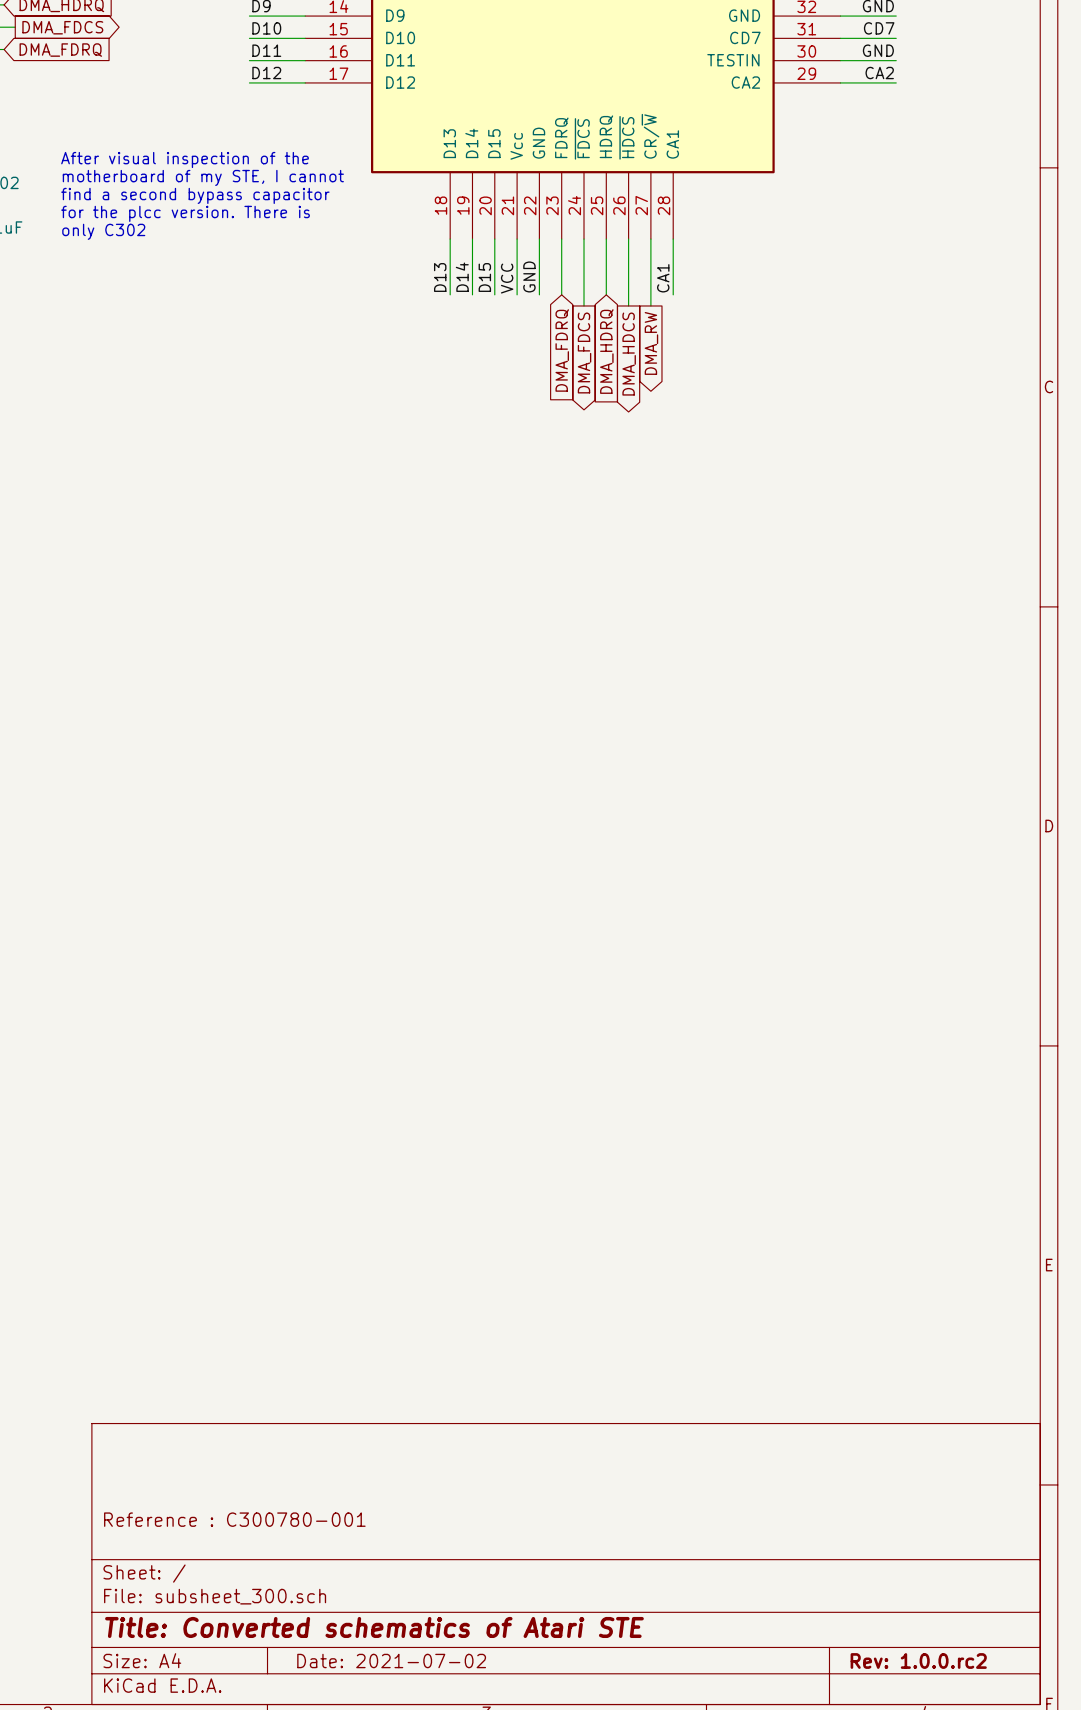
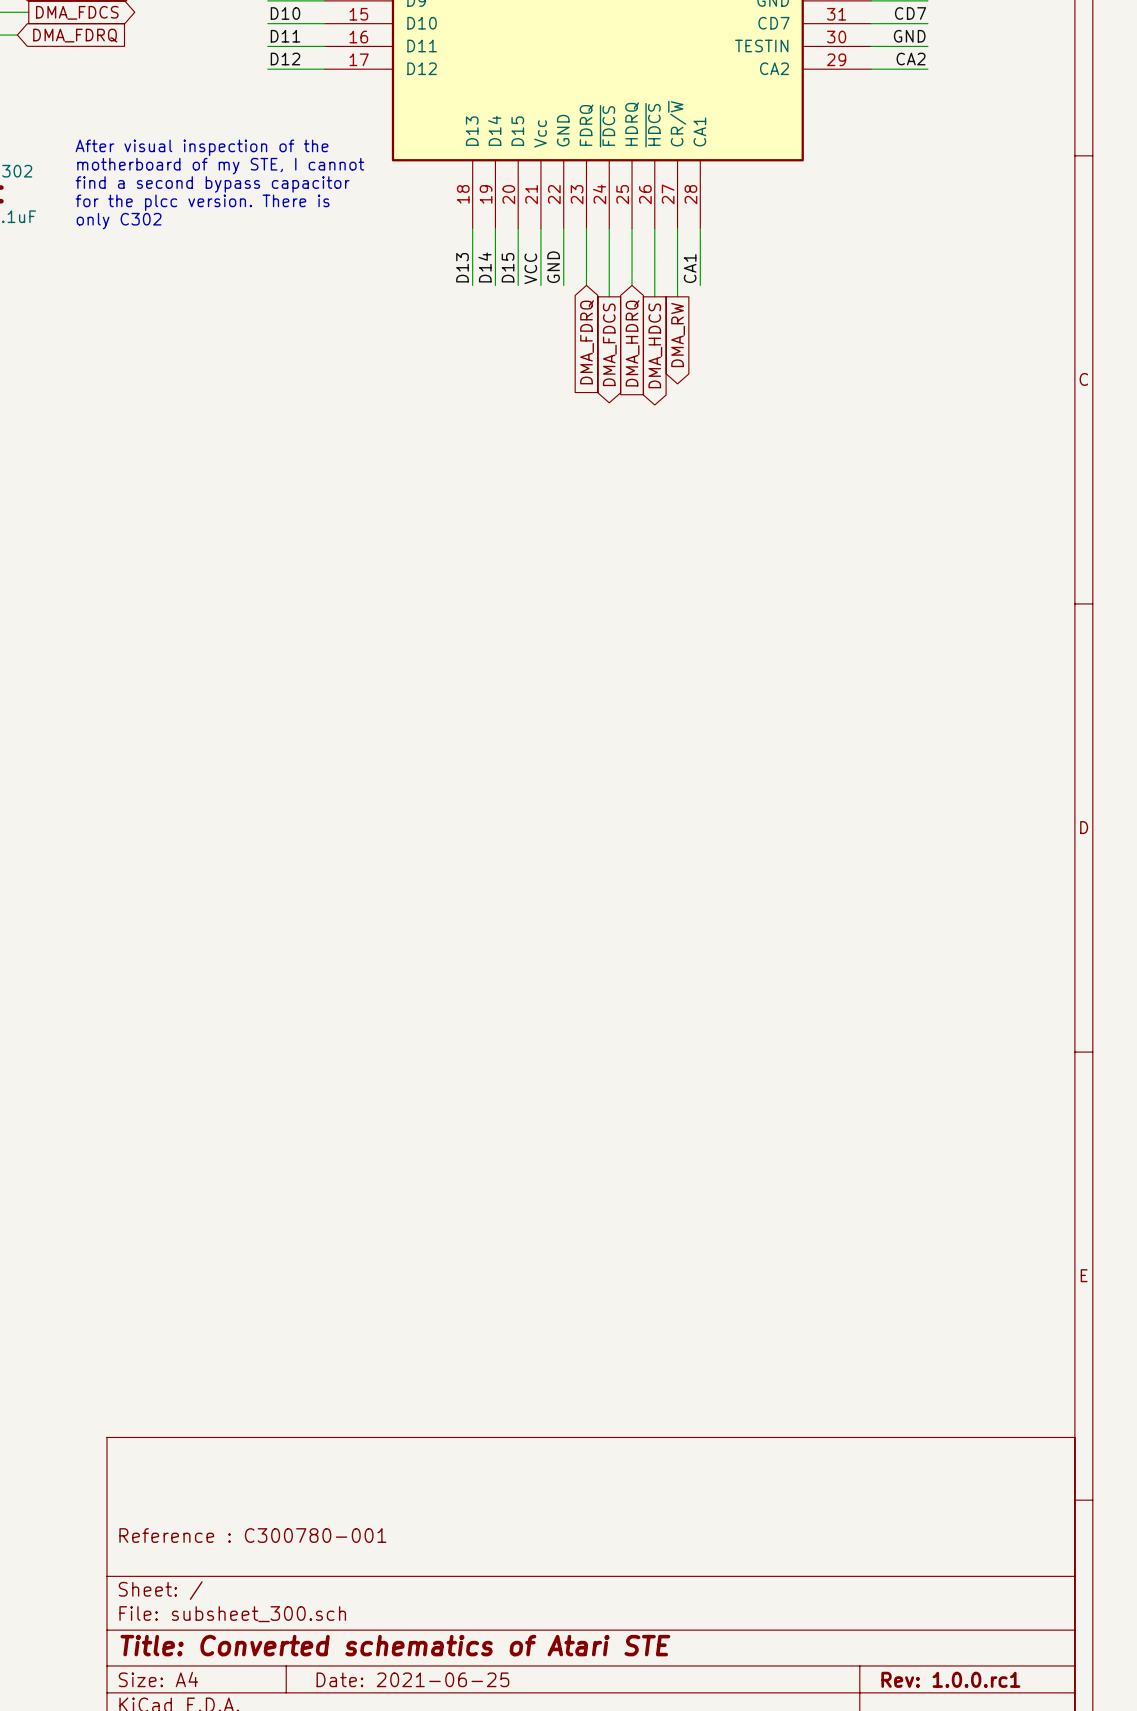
title block: Date: 2021-07-02 (391, 1661) -> Date: 2021-06-25 (412, 1679)
title block: Rev: 1.0.0.rc2 (918, 1661) -> Rev: 1.0.0.rc1 (950, 1679)

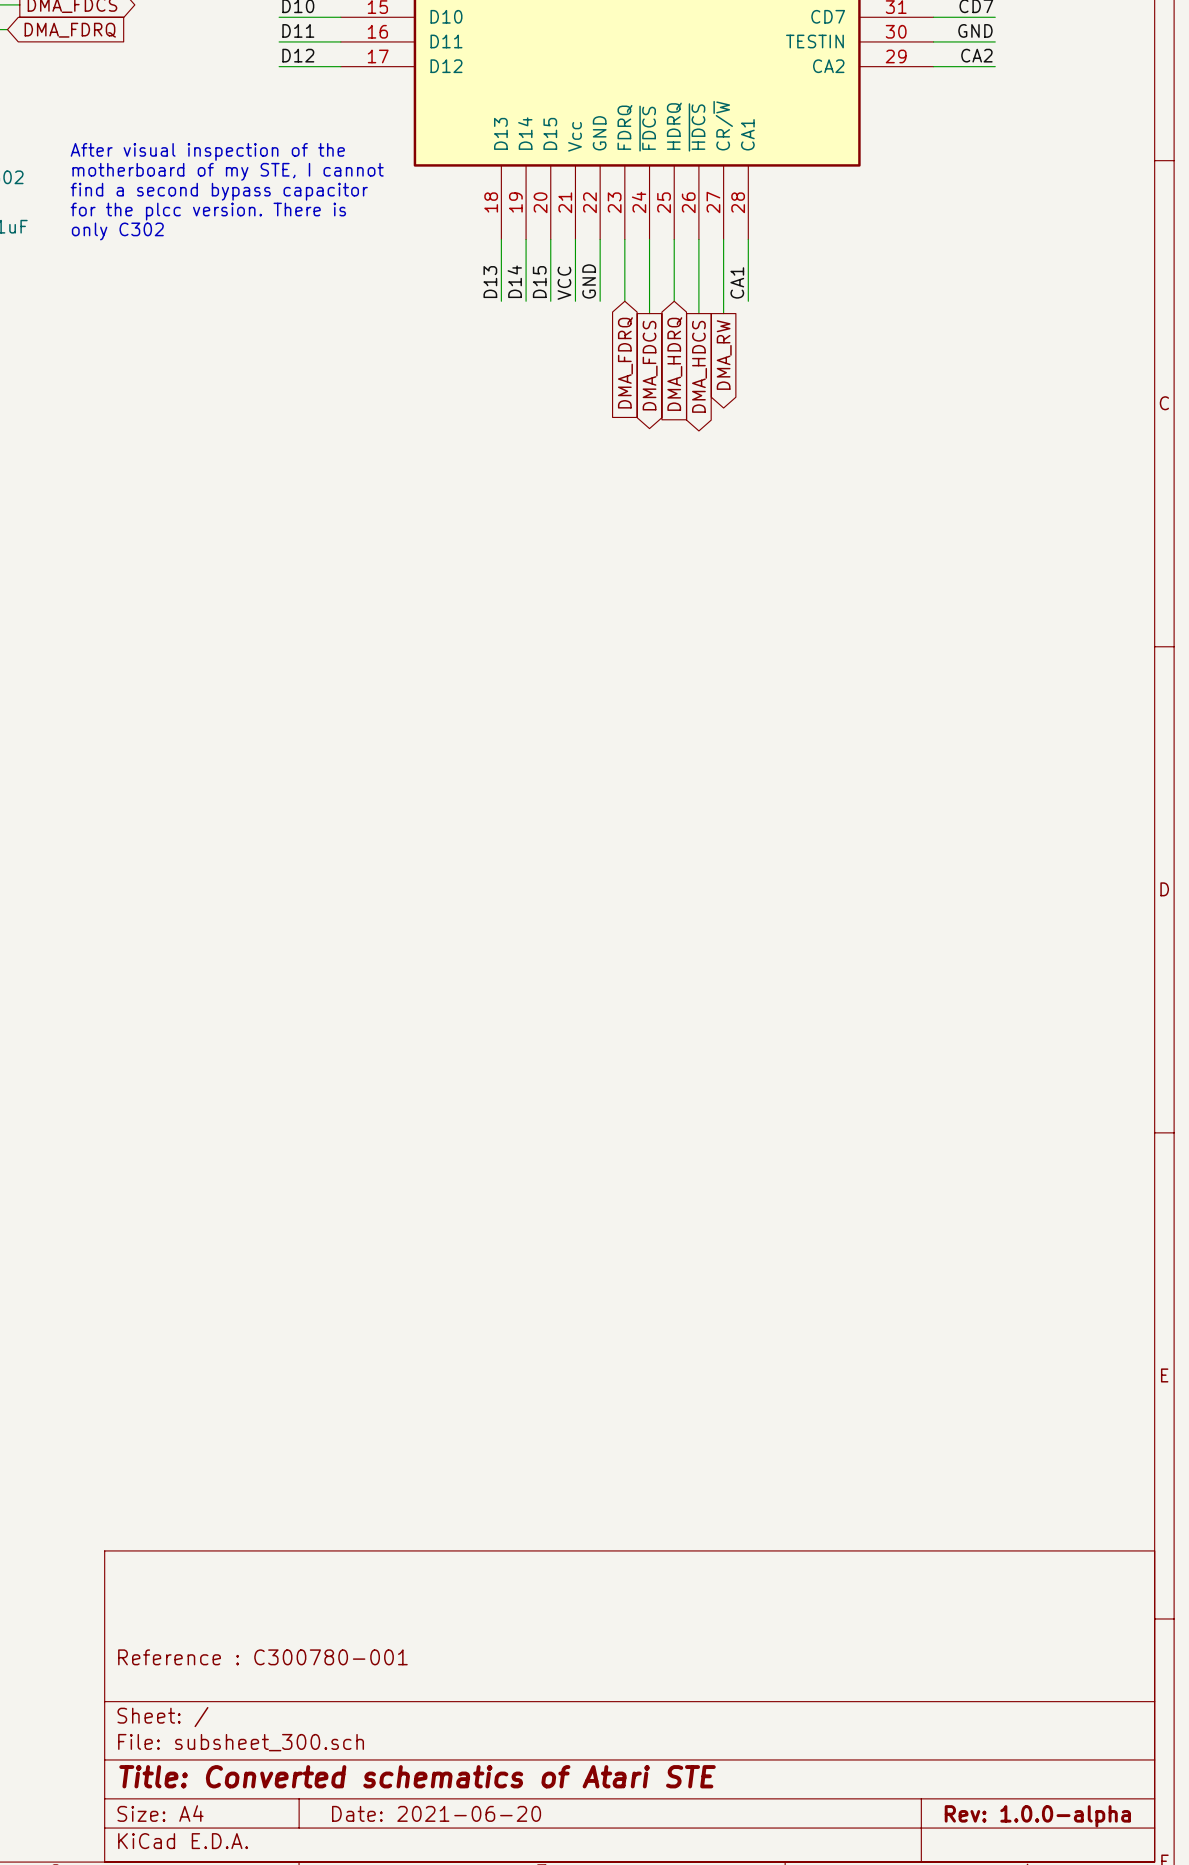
title block: Date: 2021-06-25 (412, 1679) -> Date: 2021-06-20 (436, 1813)
title block: Rev: 1.0.0.rc1 (950, 1679) -> Rev: 1.0.0-alpha (1037, 1816)

